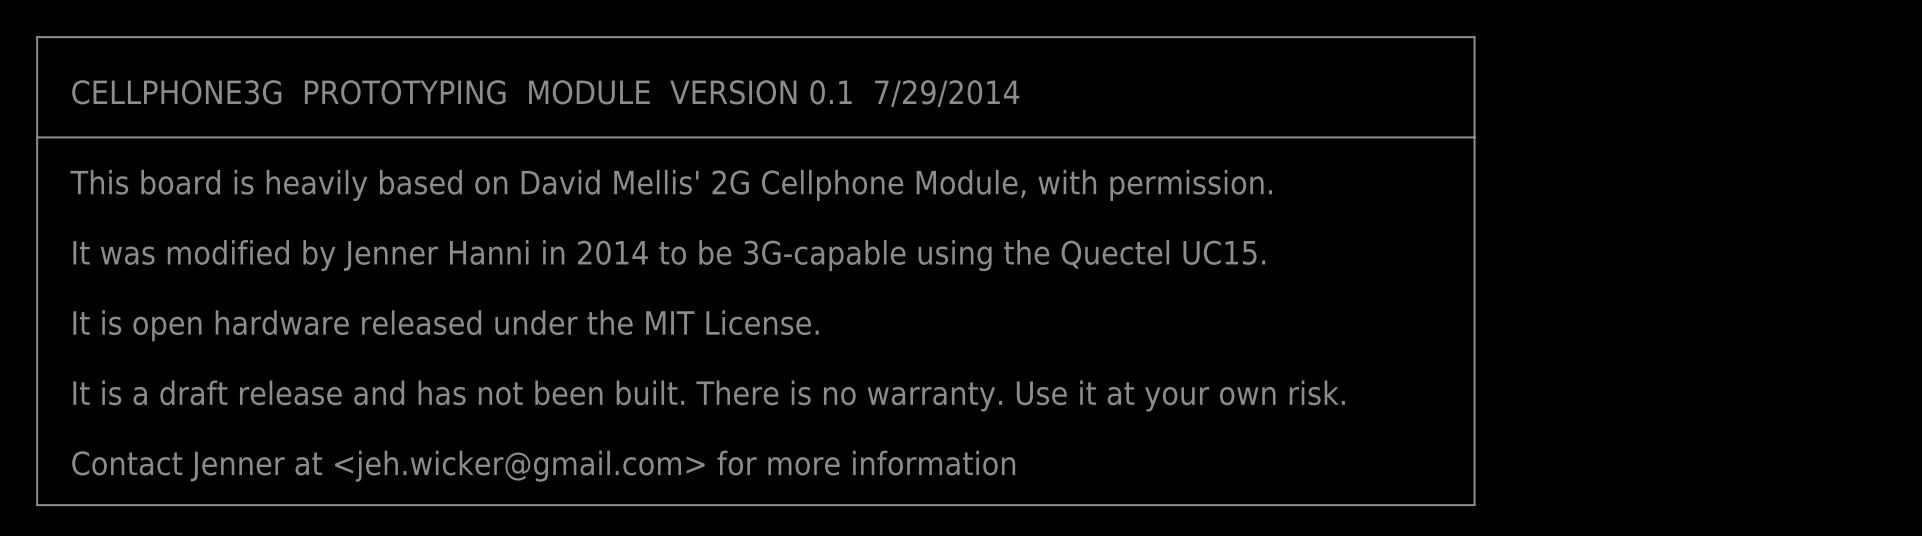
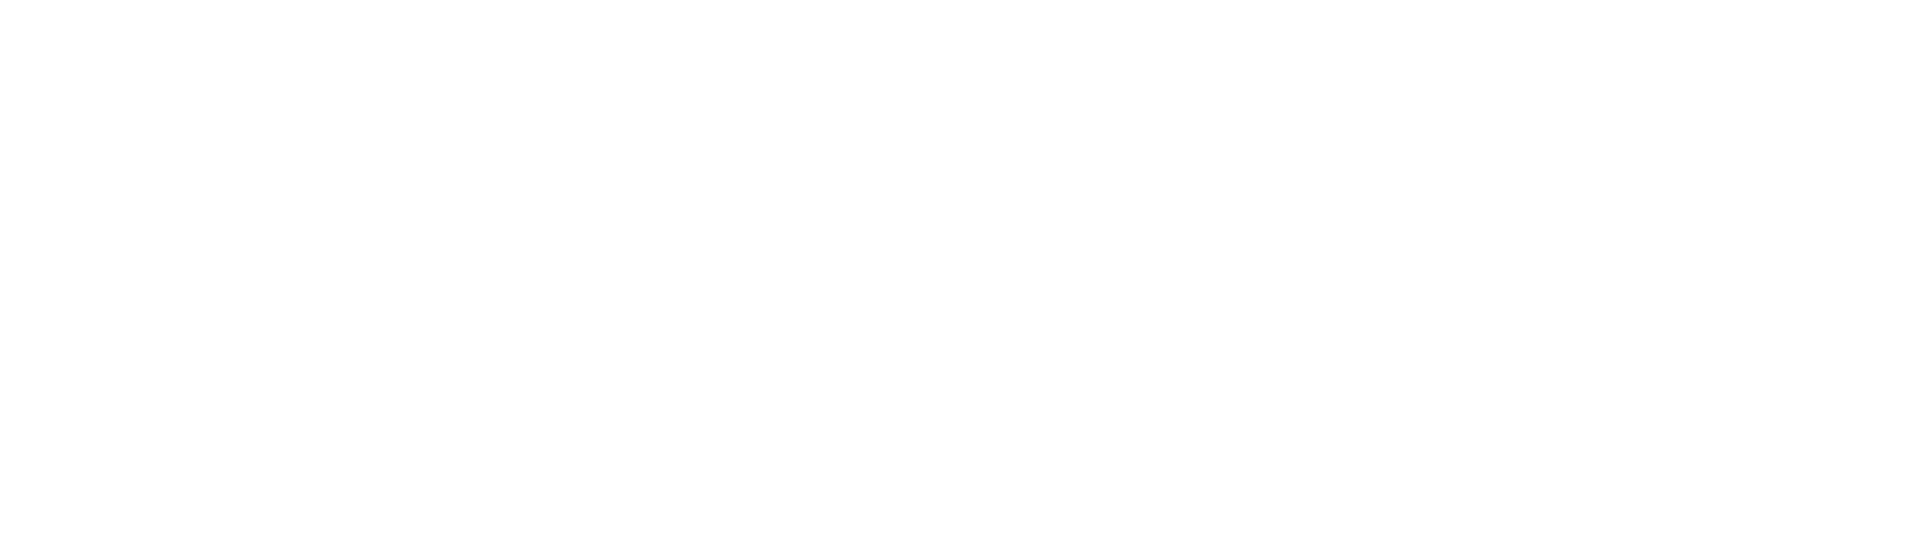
line: (37, 37) (37, 505) (1474, 505) (1474, 37) (37, 37) -> none
text: CELLPHONE3G PROTOTYPING MODULE VERSION 0.1 7/29/2014 (545, 93) -> none
line: (37, 137) (1474, 137) -> none
text: This board is heavily based on David Mellis' 2G Cellphone Module, with permission. (671, 185) -> none
text: It was modified by Jenner Hanni in 2014 to be 3G-capable using the Quectel UC15. (669, 255) -> none
text: It is open hardware released under the MIT License. (445, 325) -> none
text: It is a draft release and has not been built. There is no warranty. Use it at your own risk. (709, 395) -> none
text: Contact Jenner at <jeh.wicker@gmail.com> for more information (543, 466) -> none

